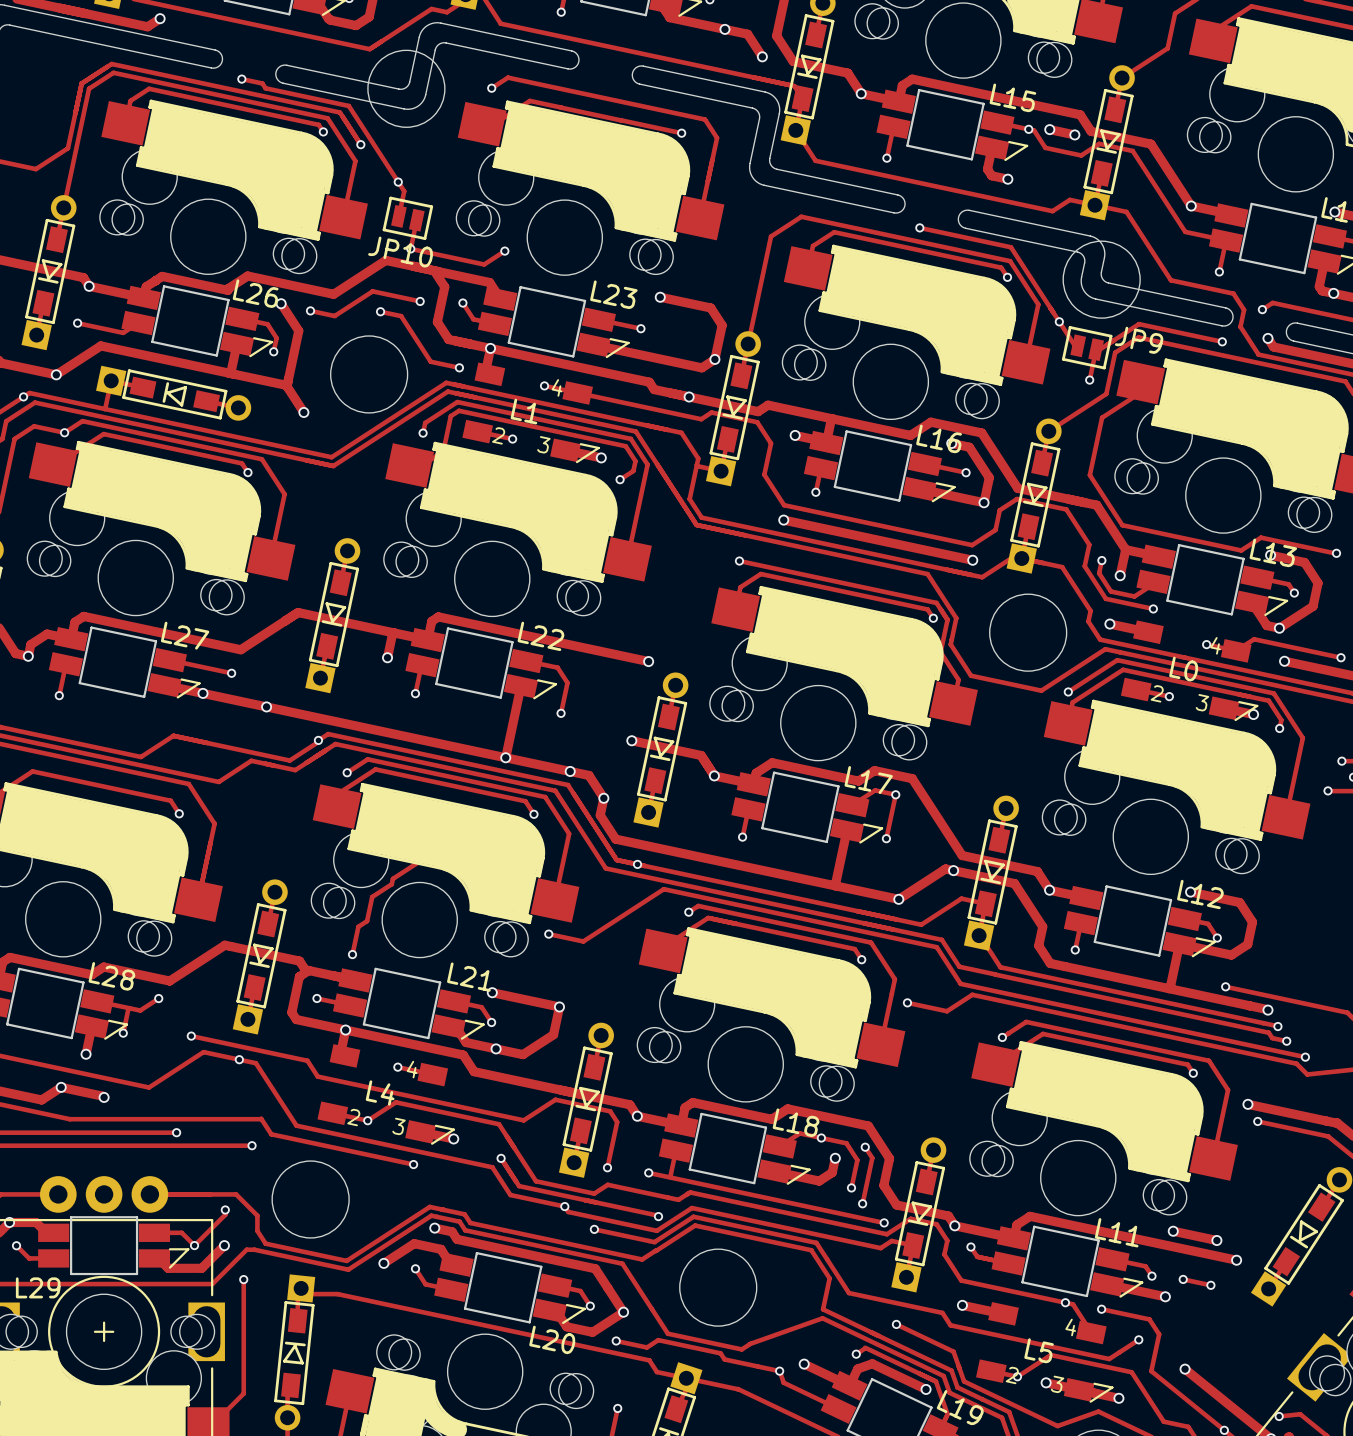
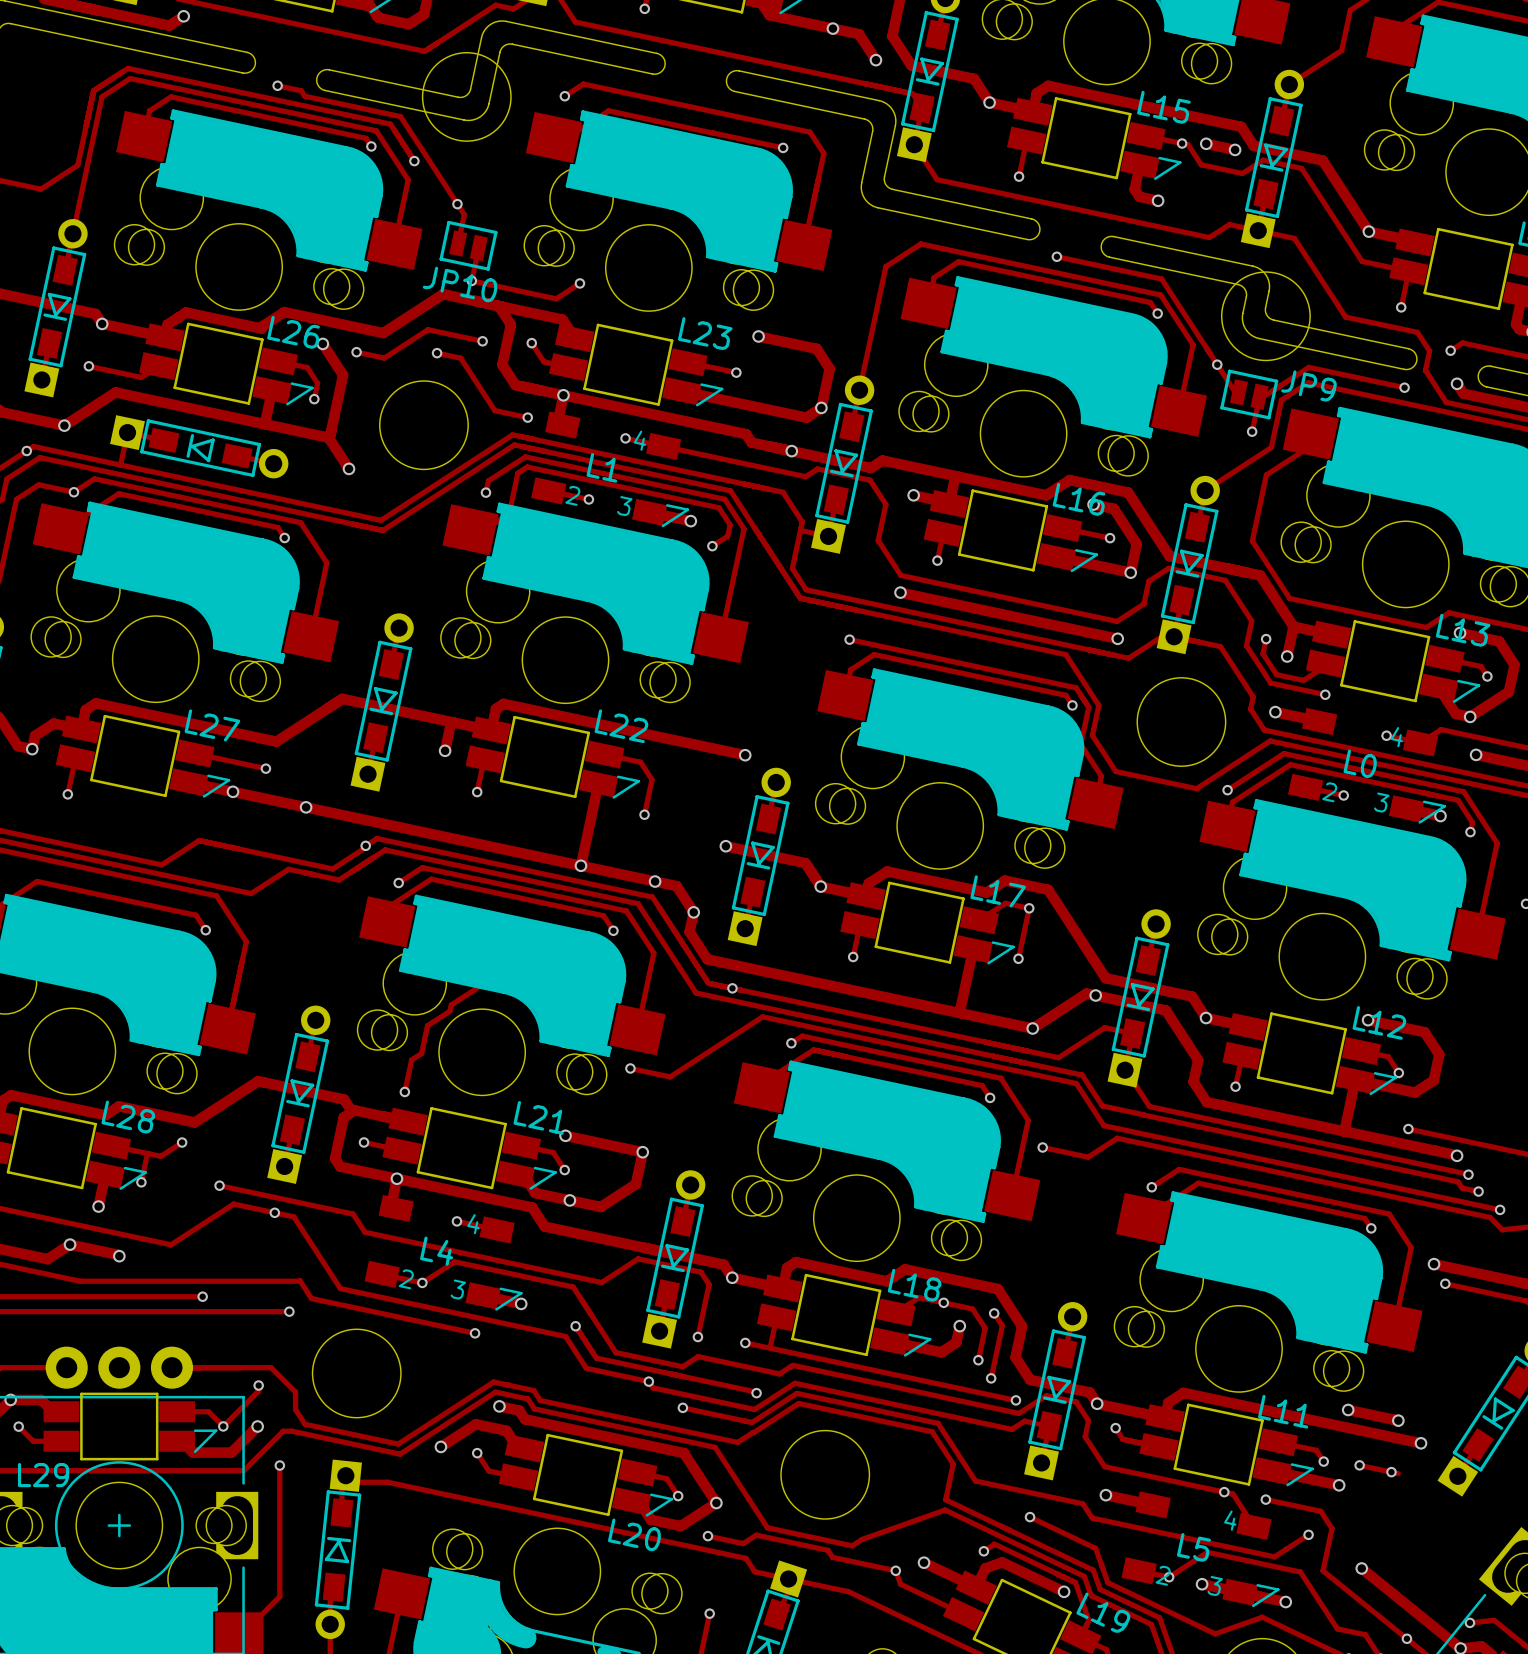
track: none -> (1391, 1472) (1398, 1473)

